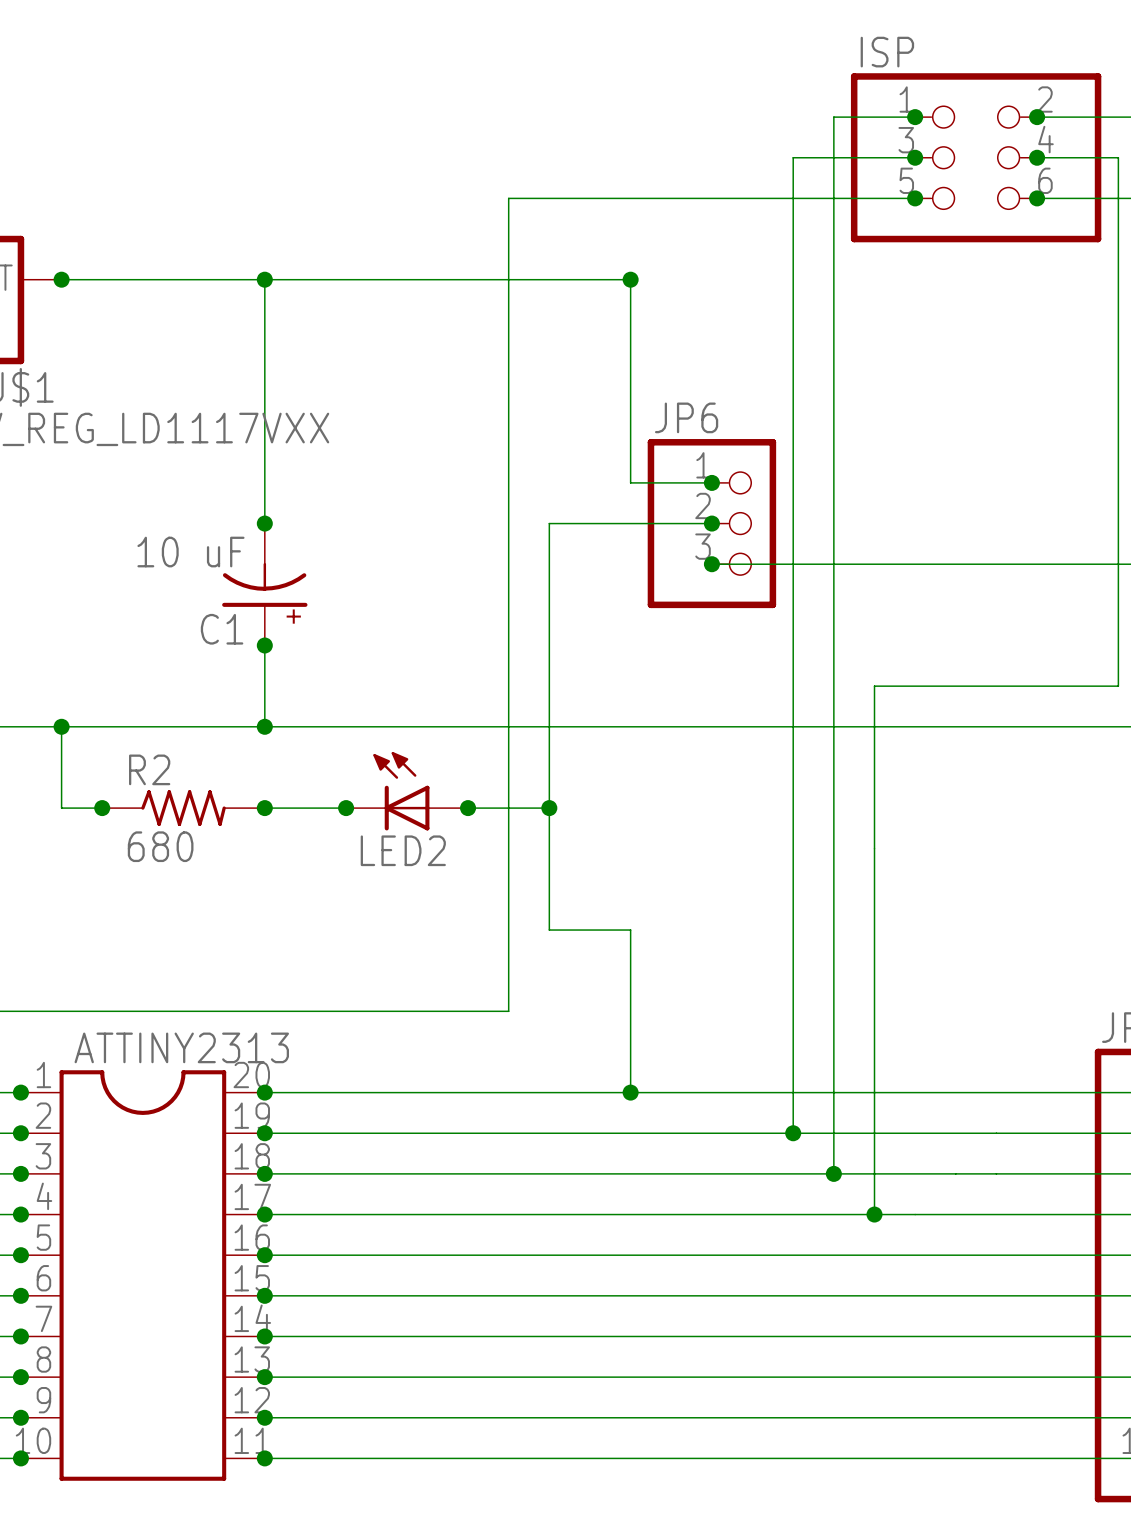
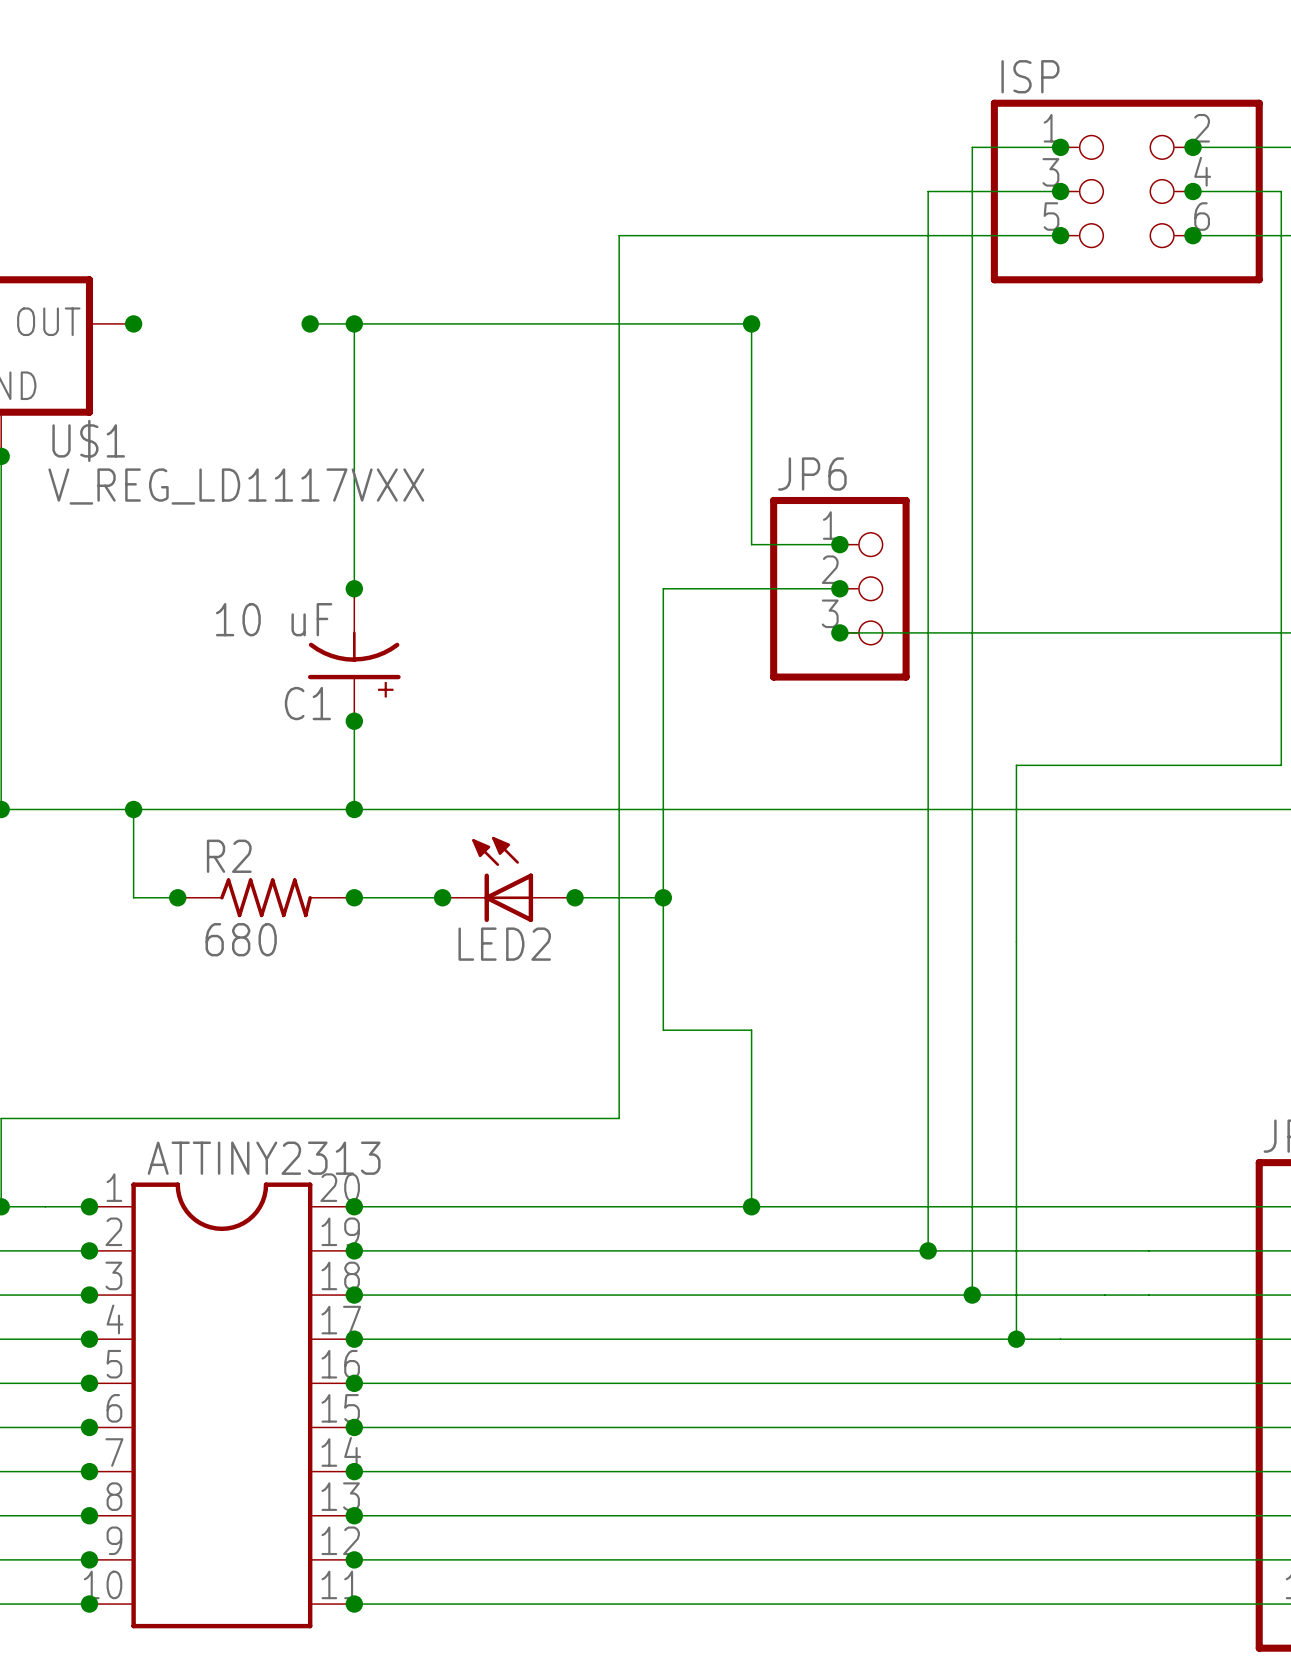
wire: (61, 279) (224, 279) -> none
junction: none -> (310, 323)

